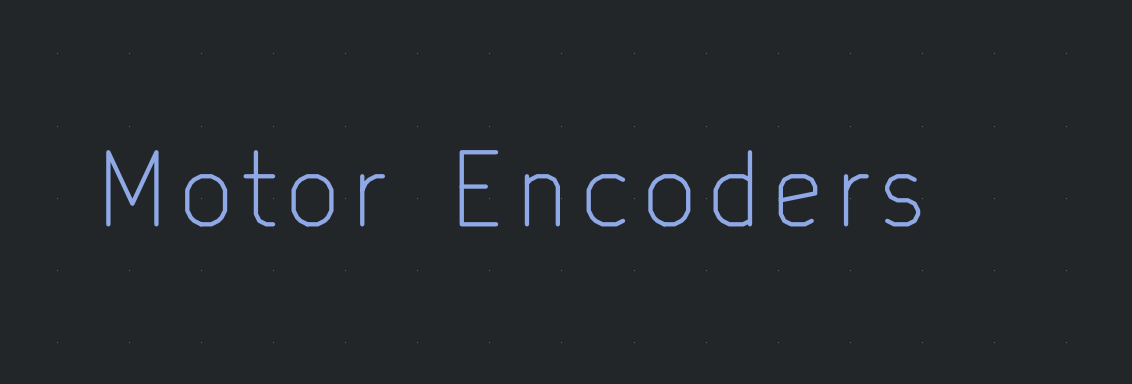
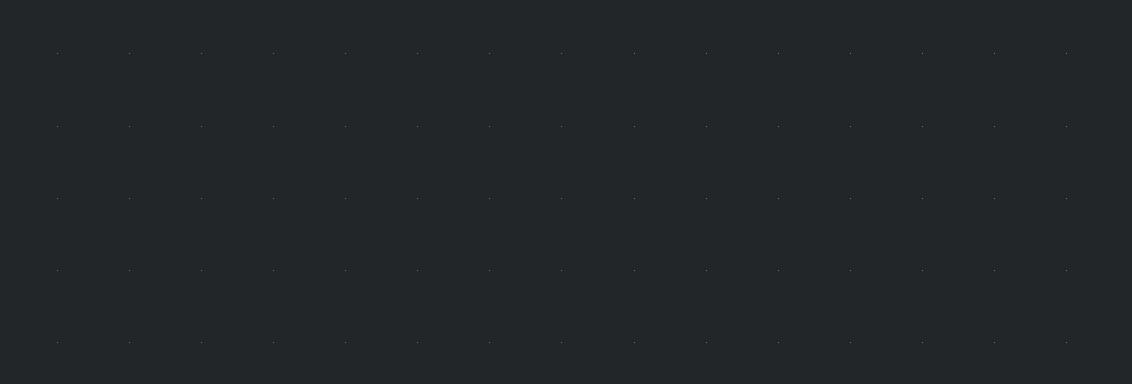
text: Motor Encoders (513, 188) -> none

